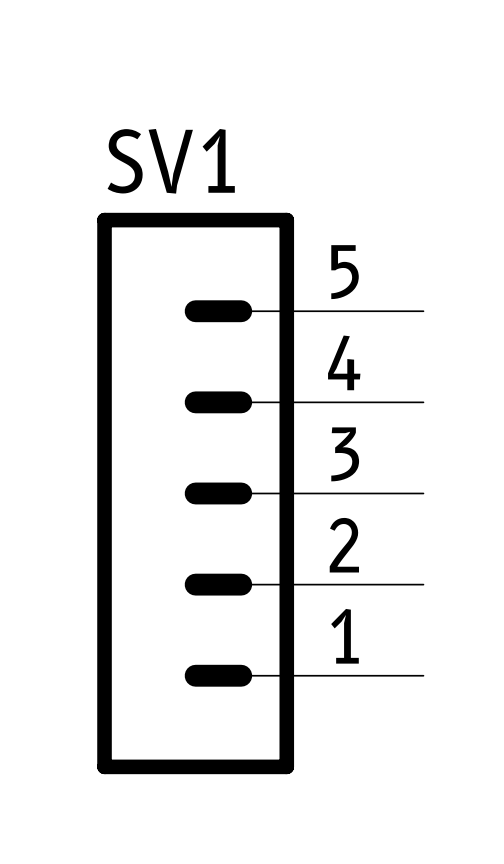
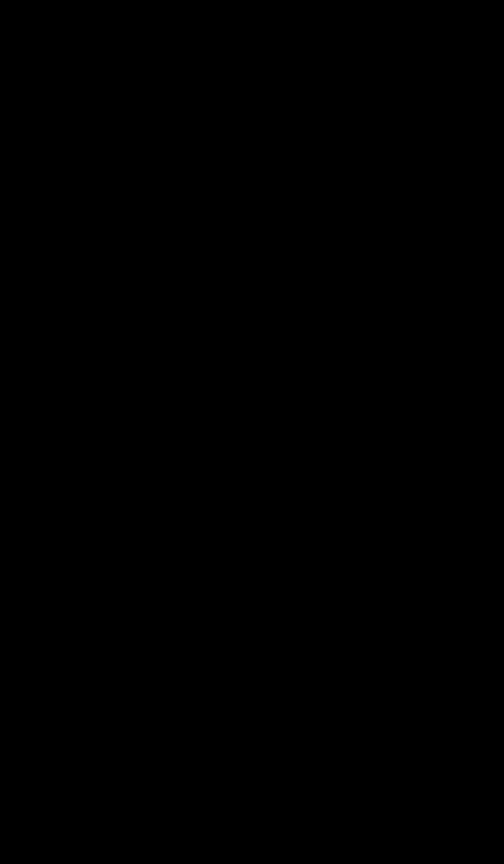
SV1: (260, 493) -> none

